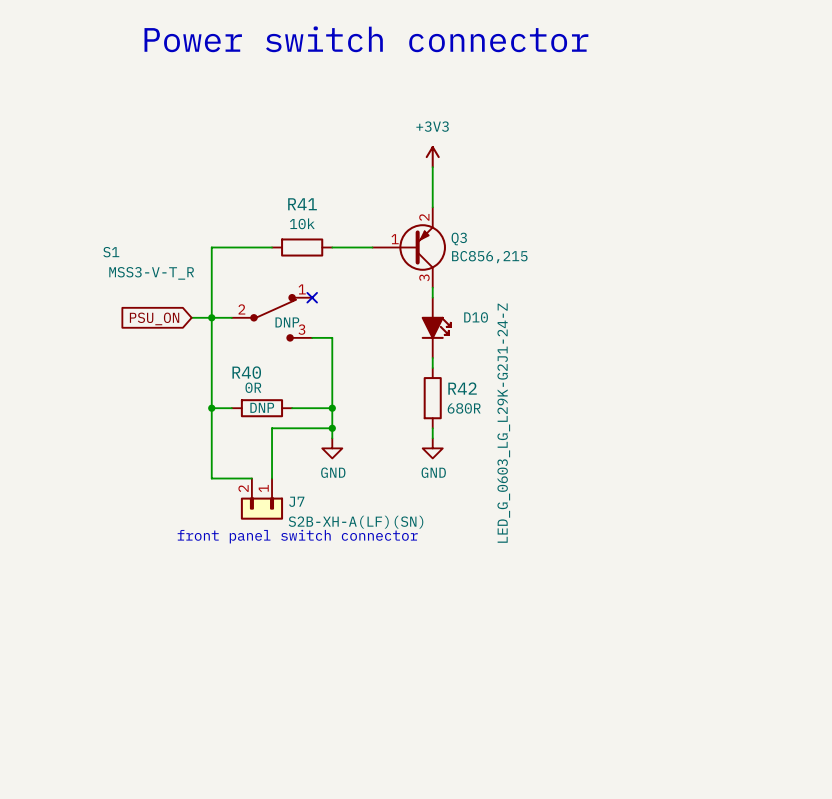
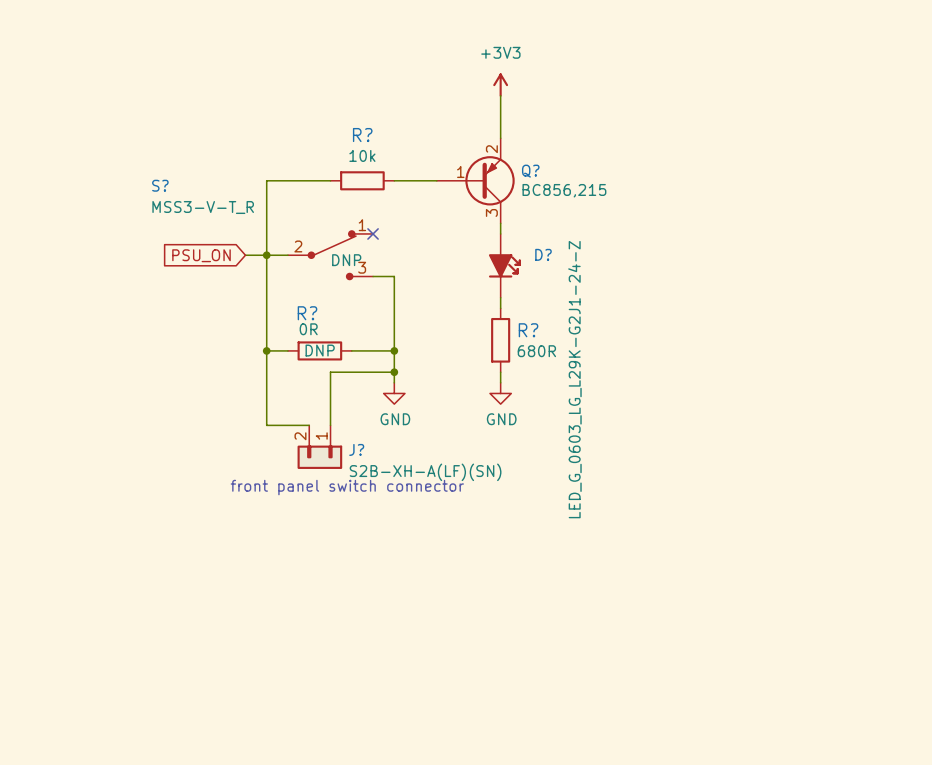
R41 name: R41 (302, 204) -> R? (362, 135)
Q3 name: Q3 (459, 238) -> Q? (530, 171)
S1 name: S1 (111, 252) -> S? (160, 185)
D10 name: D10 (476, 317) -> D? (543, 254)
R40 name: R40 (246, 372) -> R? (307, 313)
R42 name: R42 (462, 388) -> R? (528, 330)
J7 name: J7 (296, 501) -> J? (356, 449)

